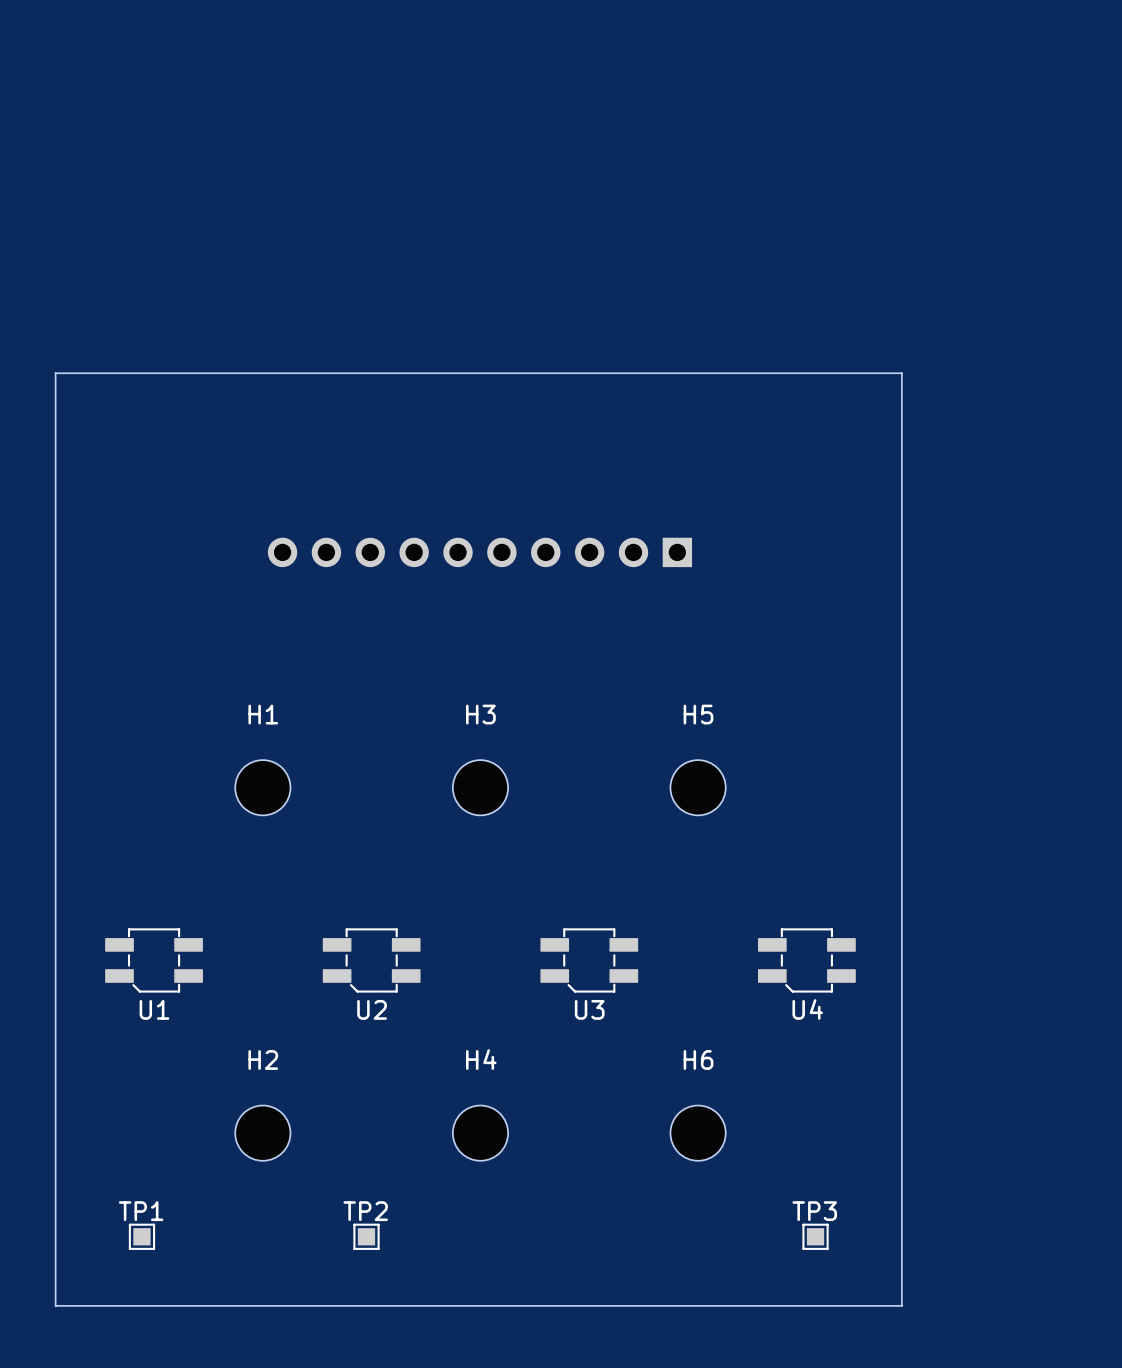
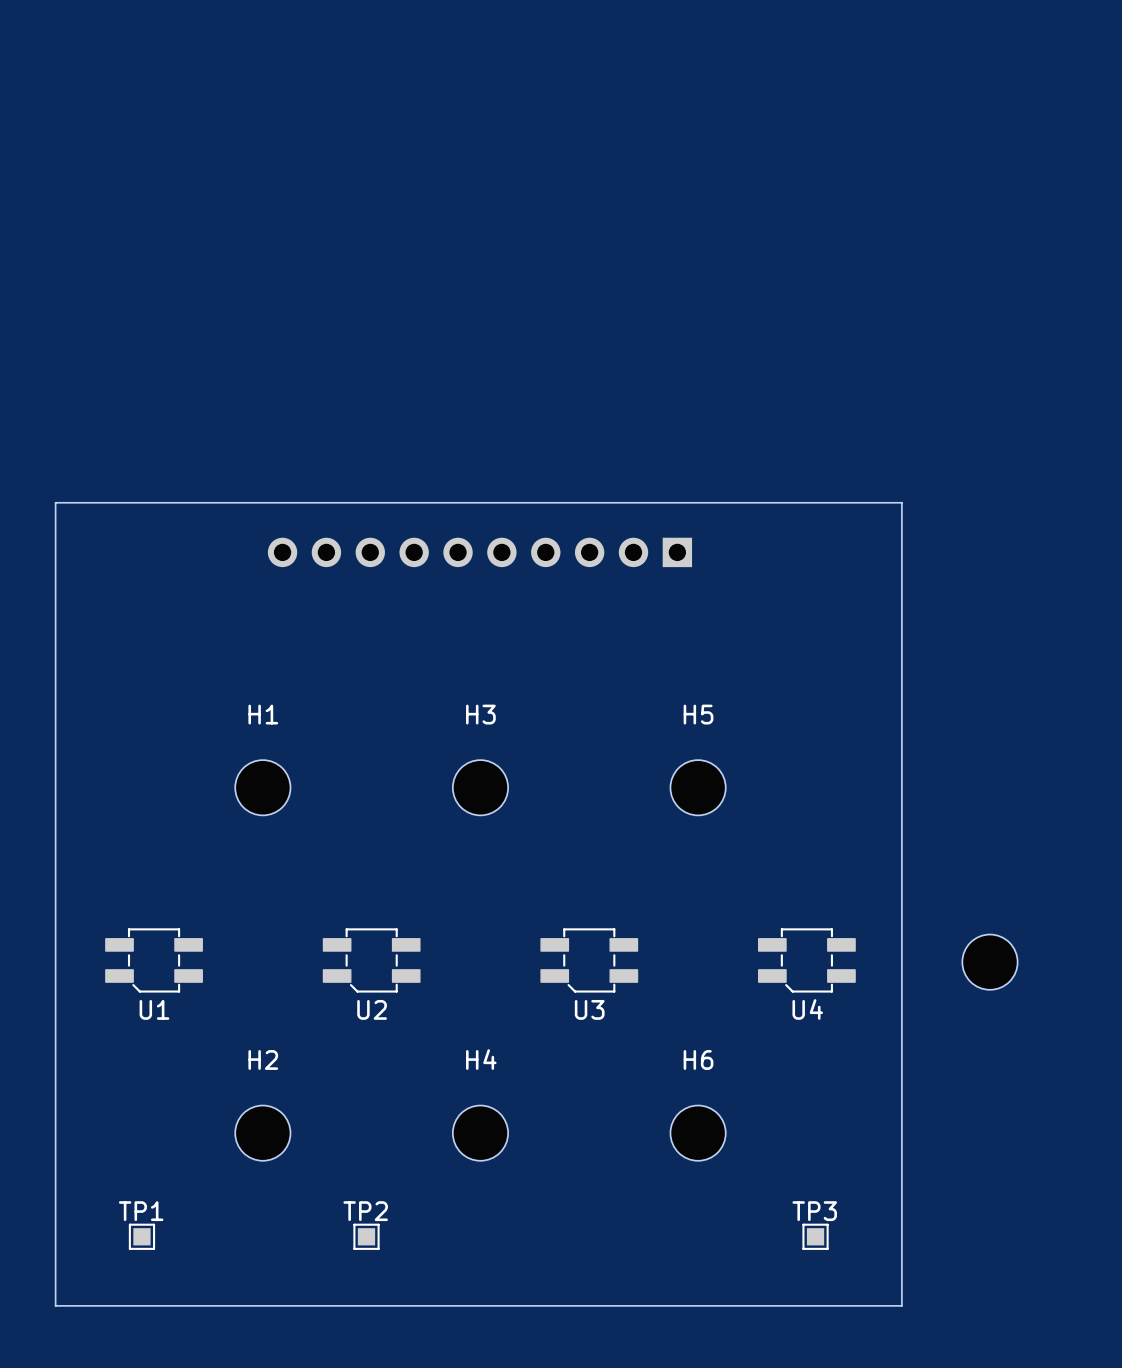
board edge: (55, 502) (55, 373) (901, 373) (901, 502) -> (55, 502) (901, 502)
part: none -> (989, 962)

